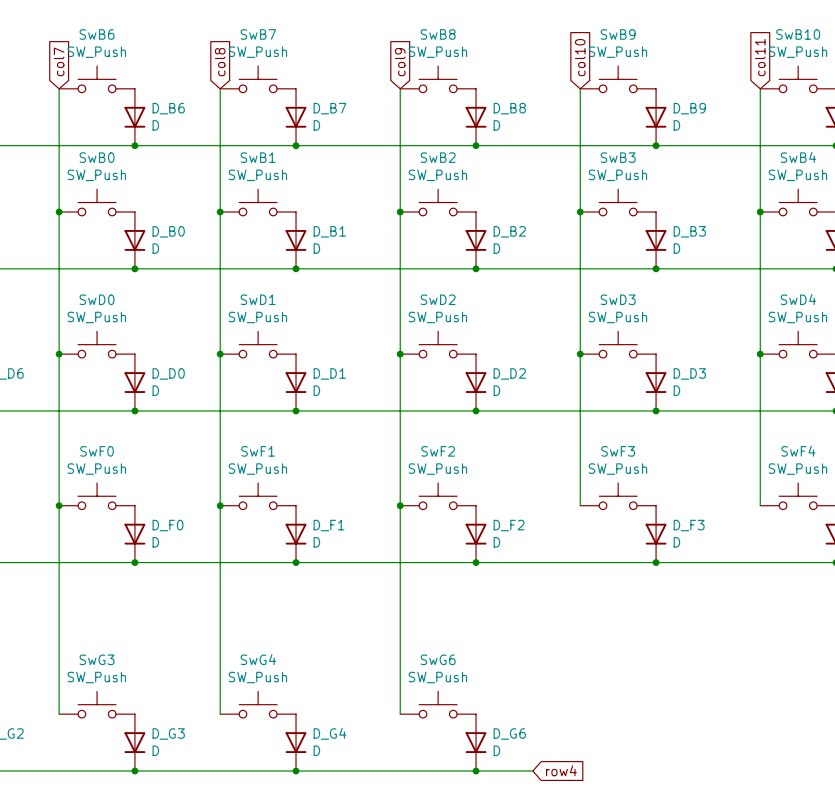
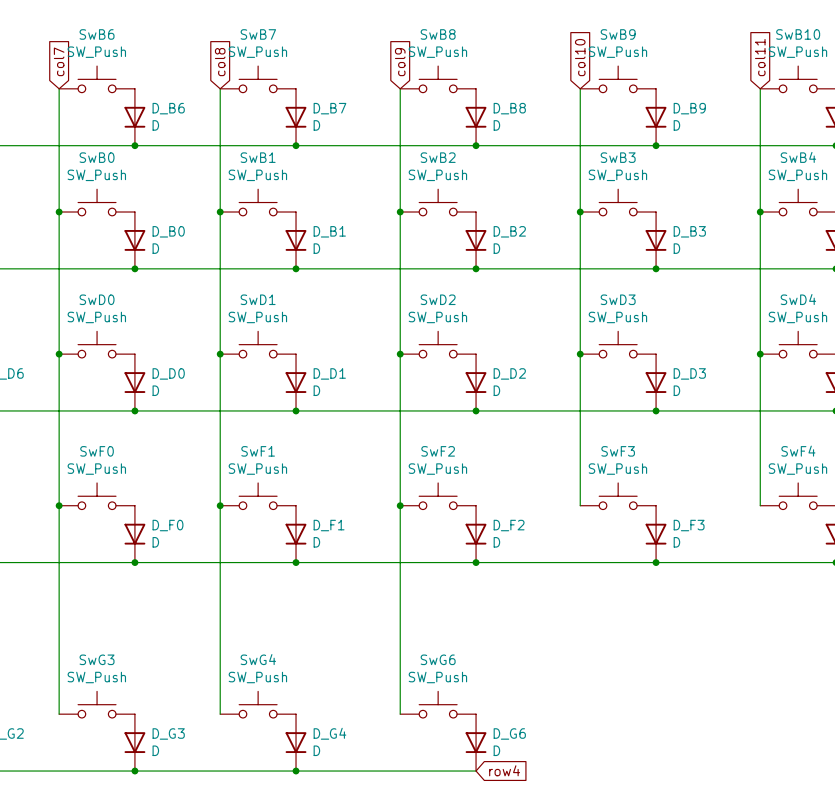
global label position: row4 (561, 770) -> row4 (504, 770)
wire: (476, 771) (532, 771) -> none
junction: (476, 771) -> none

